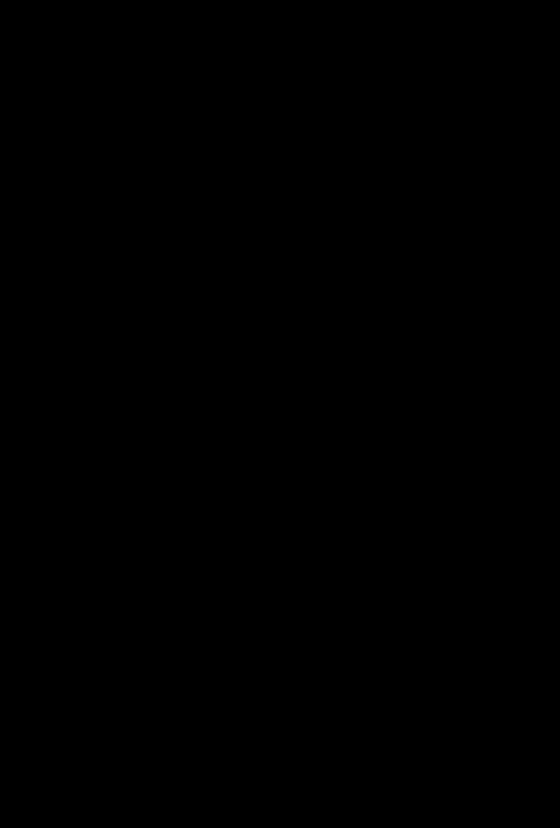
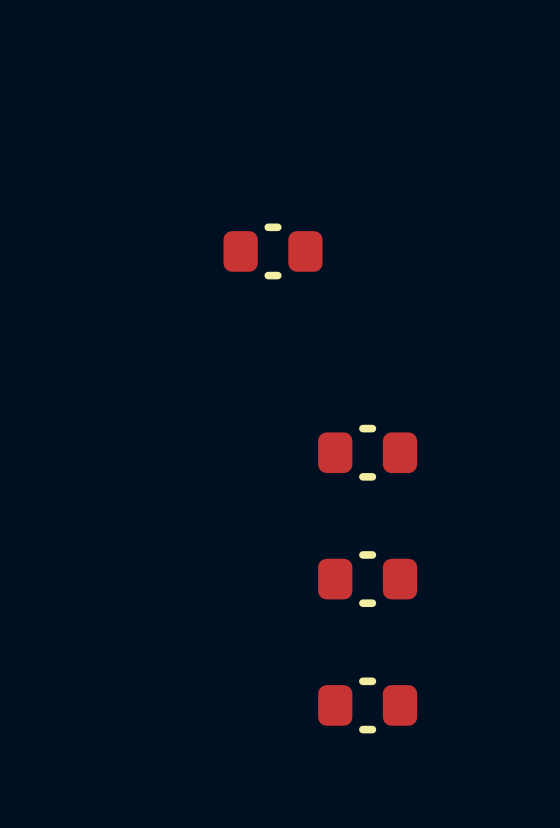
part: none -> (273, 251)
part: none -> (367, 452)
part: none -> (367, 579)
part: none -> (367, 705)

